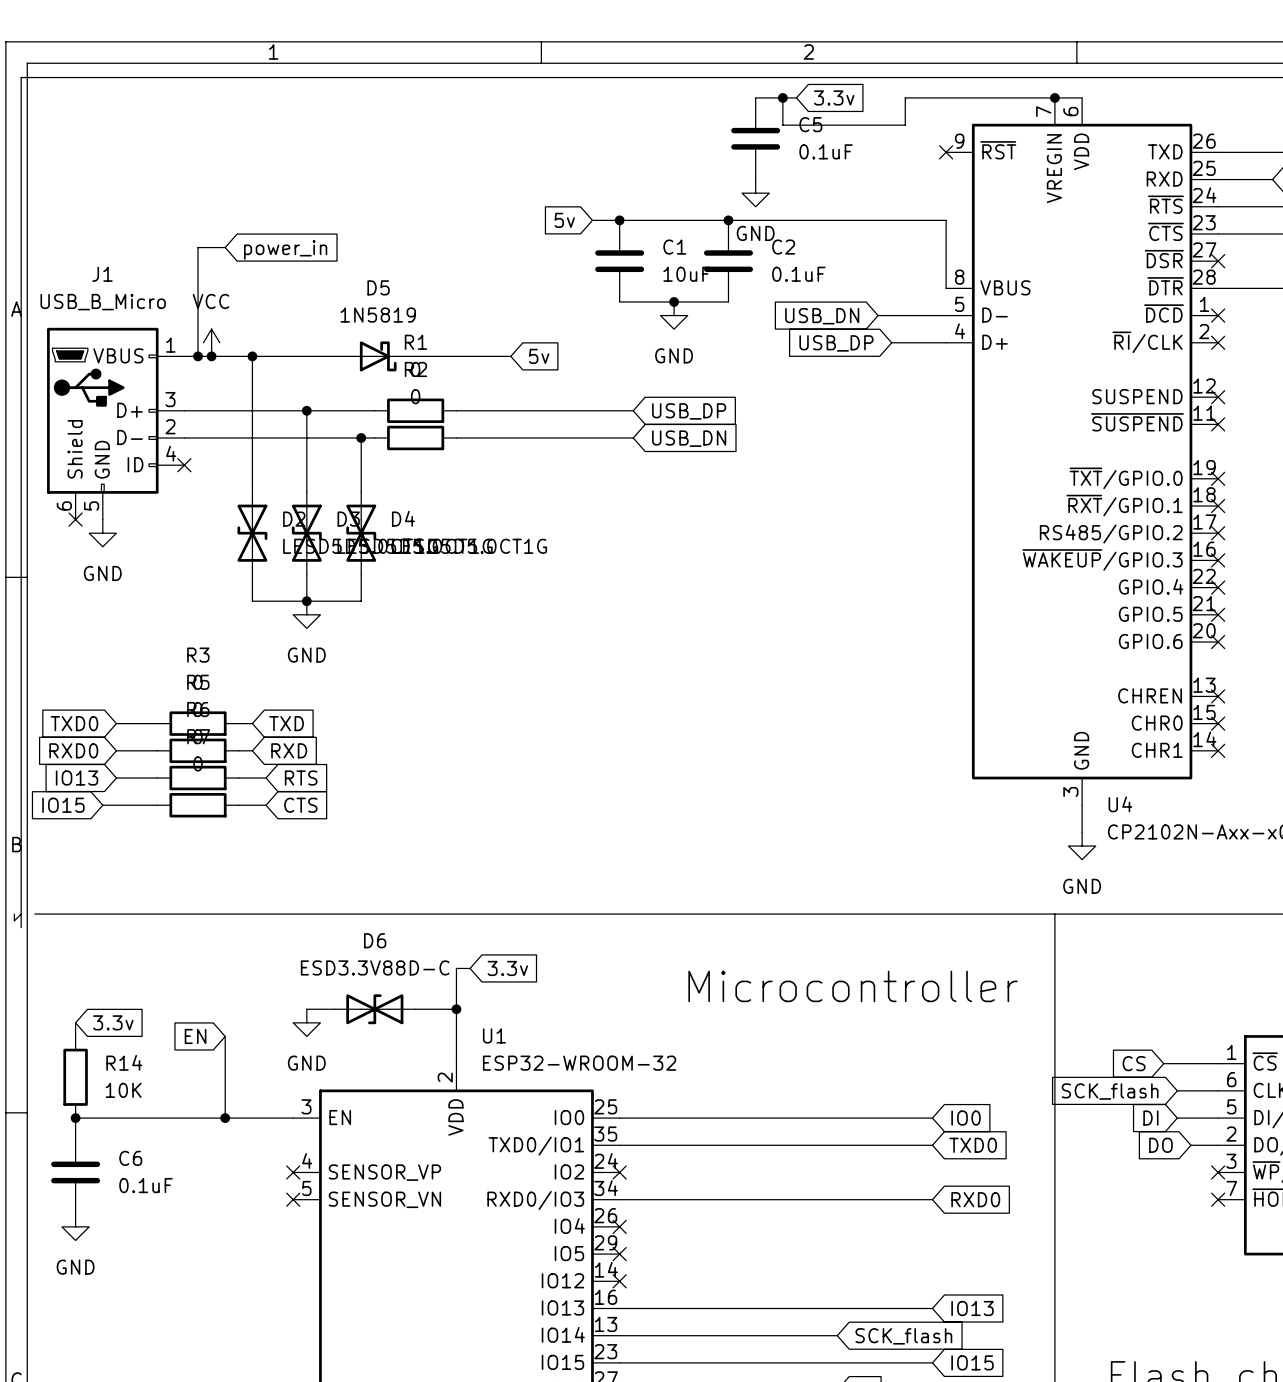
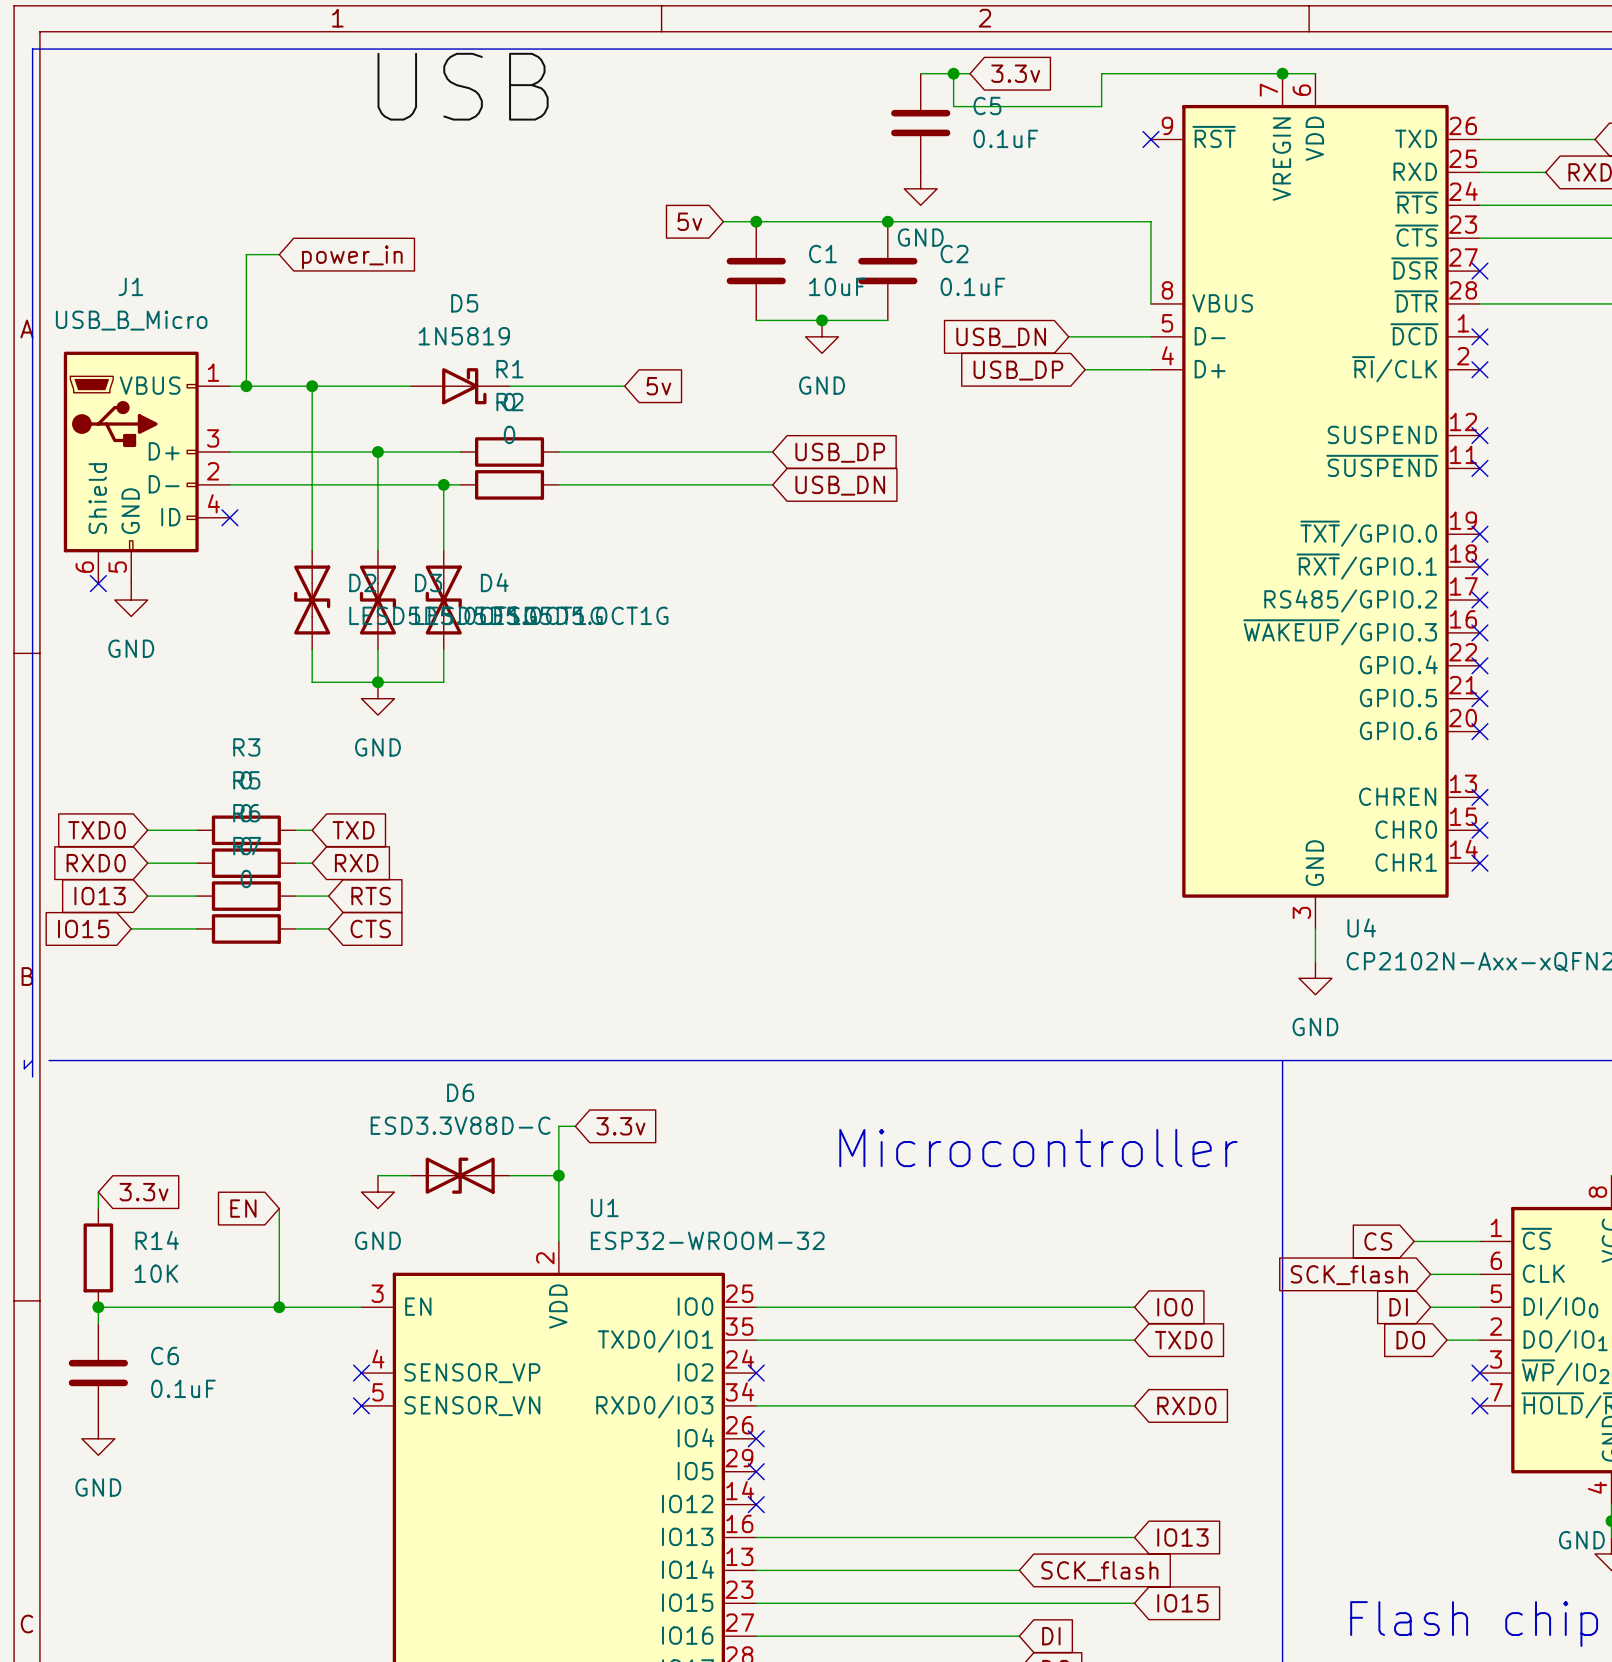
label: none -> USB (463, 86)
power symbol: VCC (211, 342) -> none
junction: (211, 356) -> none

